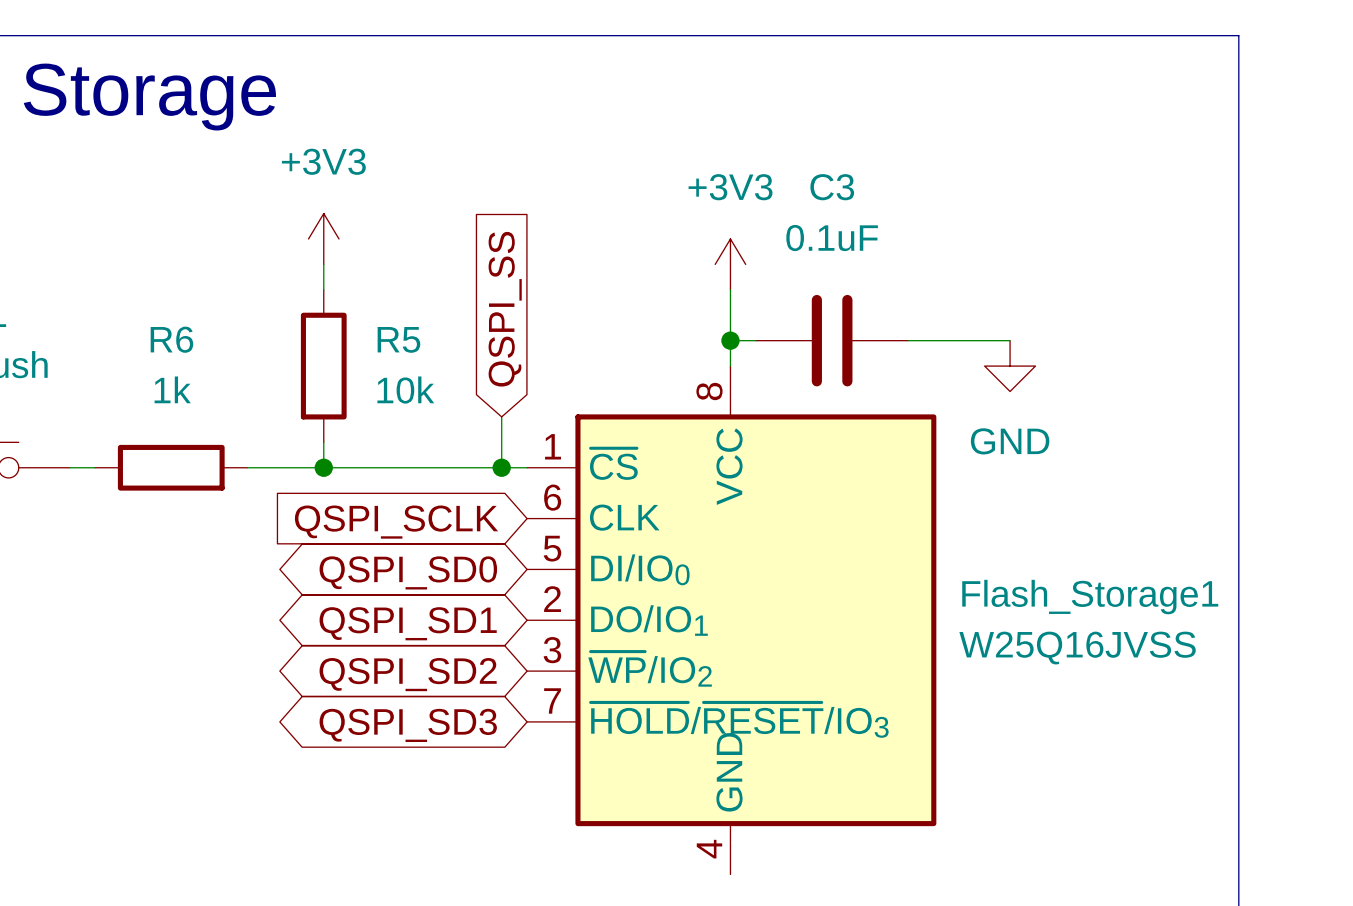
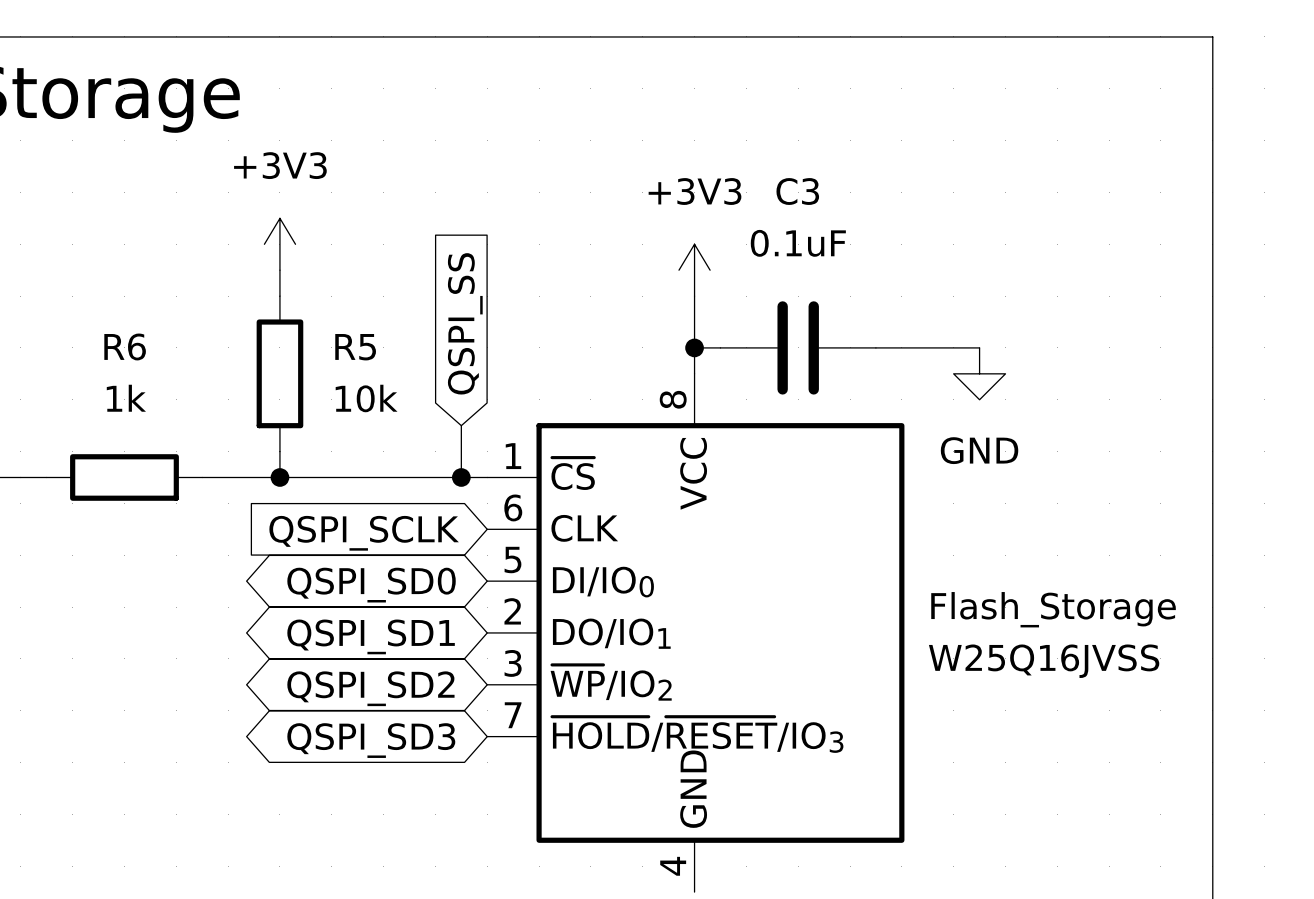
Flash_Storage1 name: Flash_Storage1 (1090, 597) -> Flash_Storage (1053, 609)

